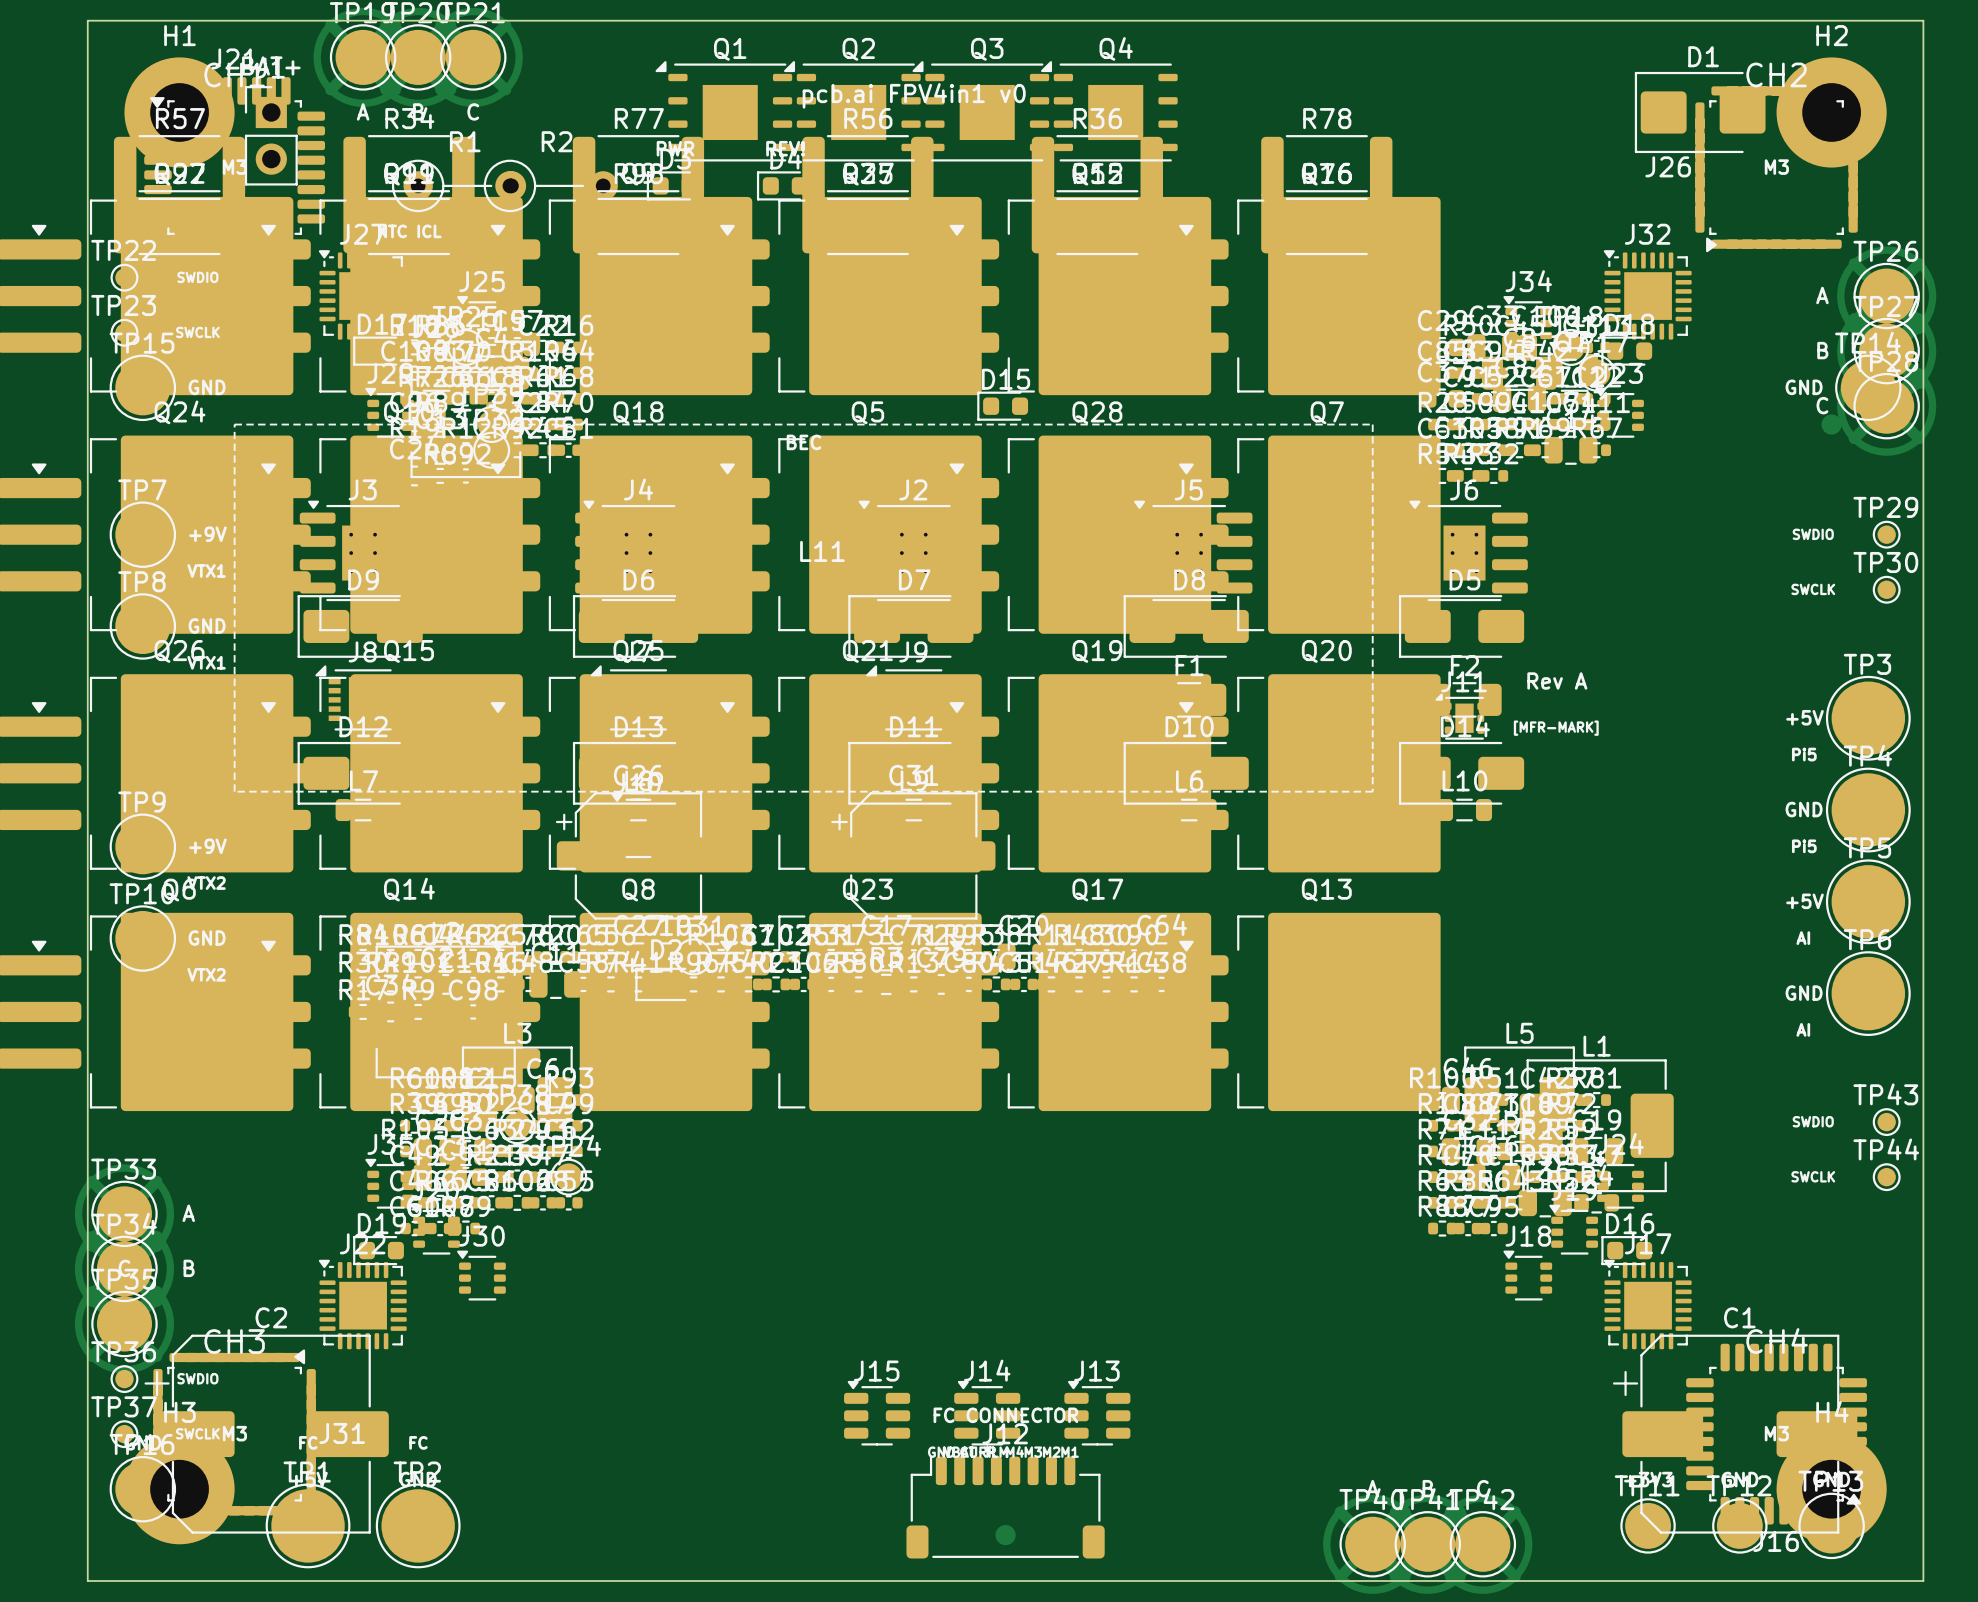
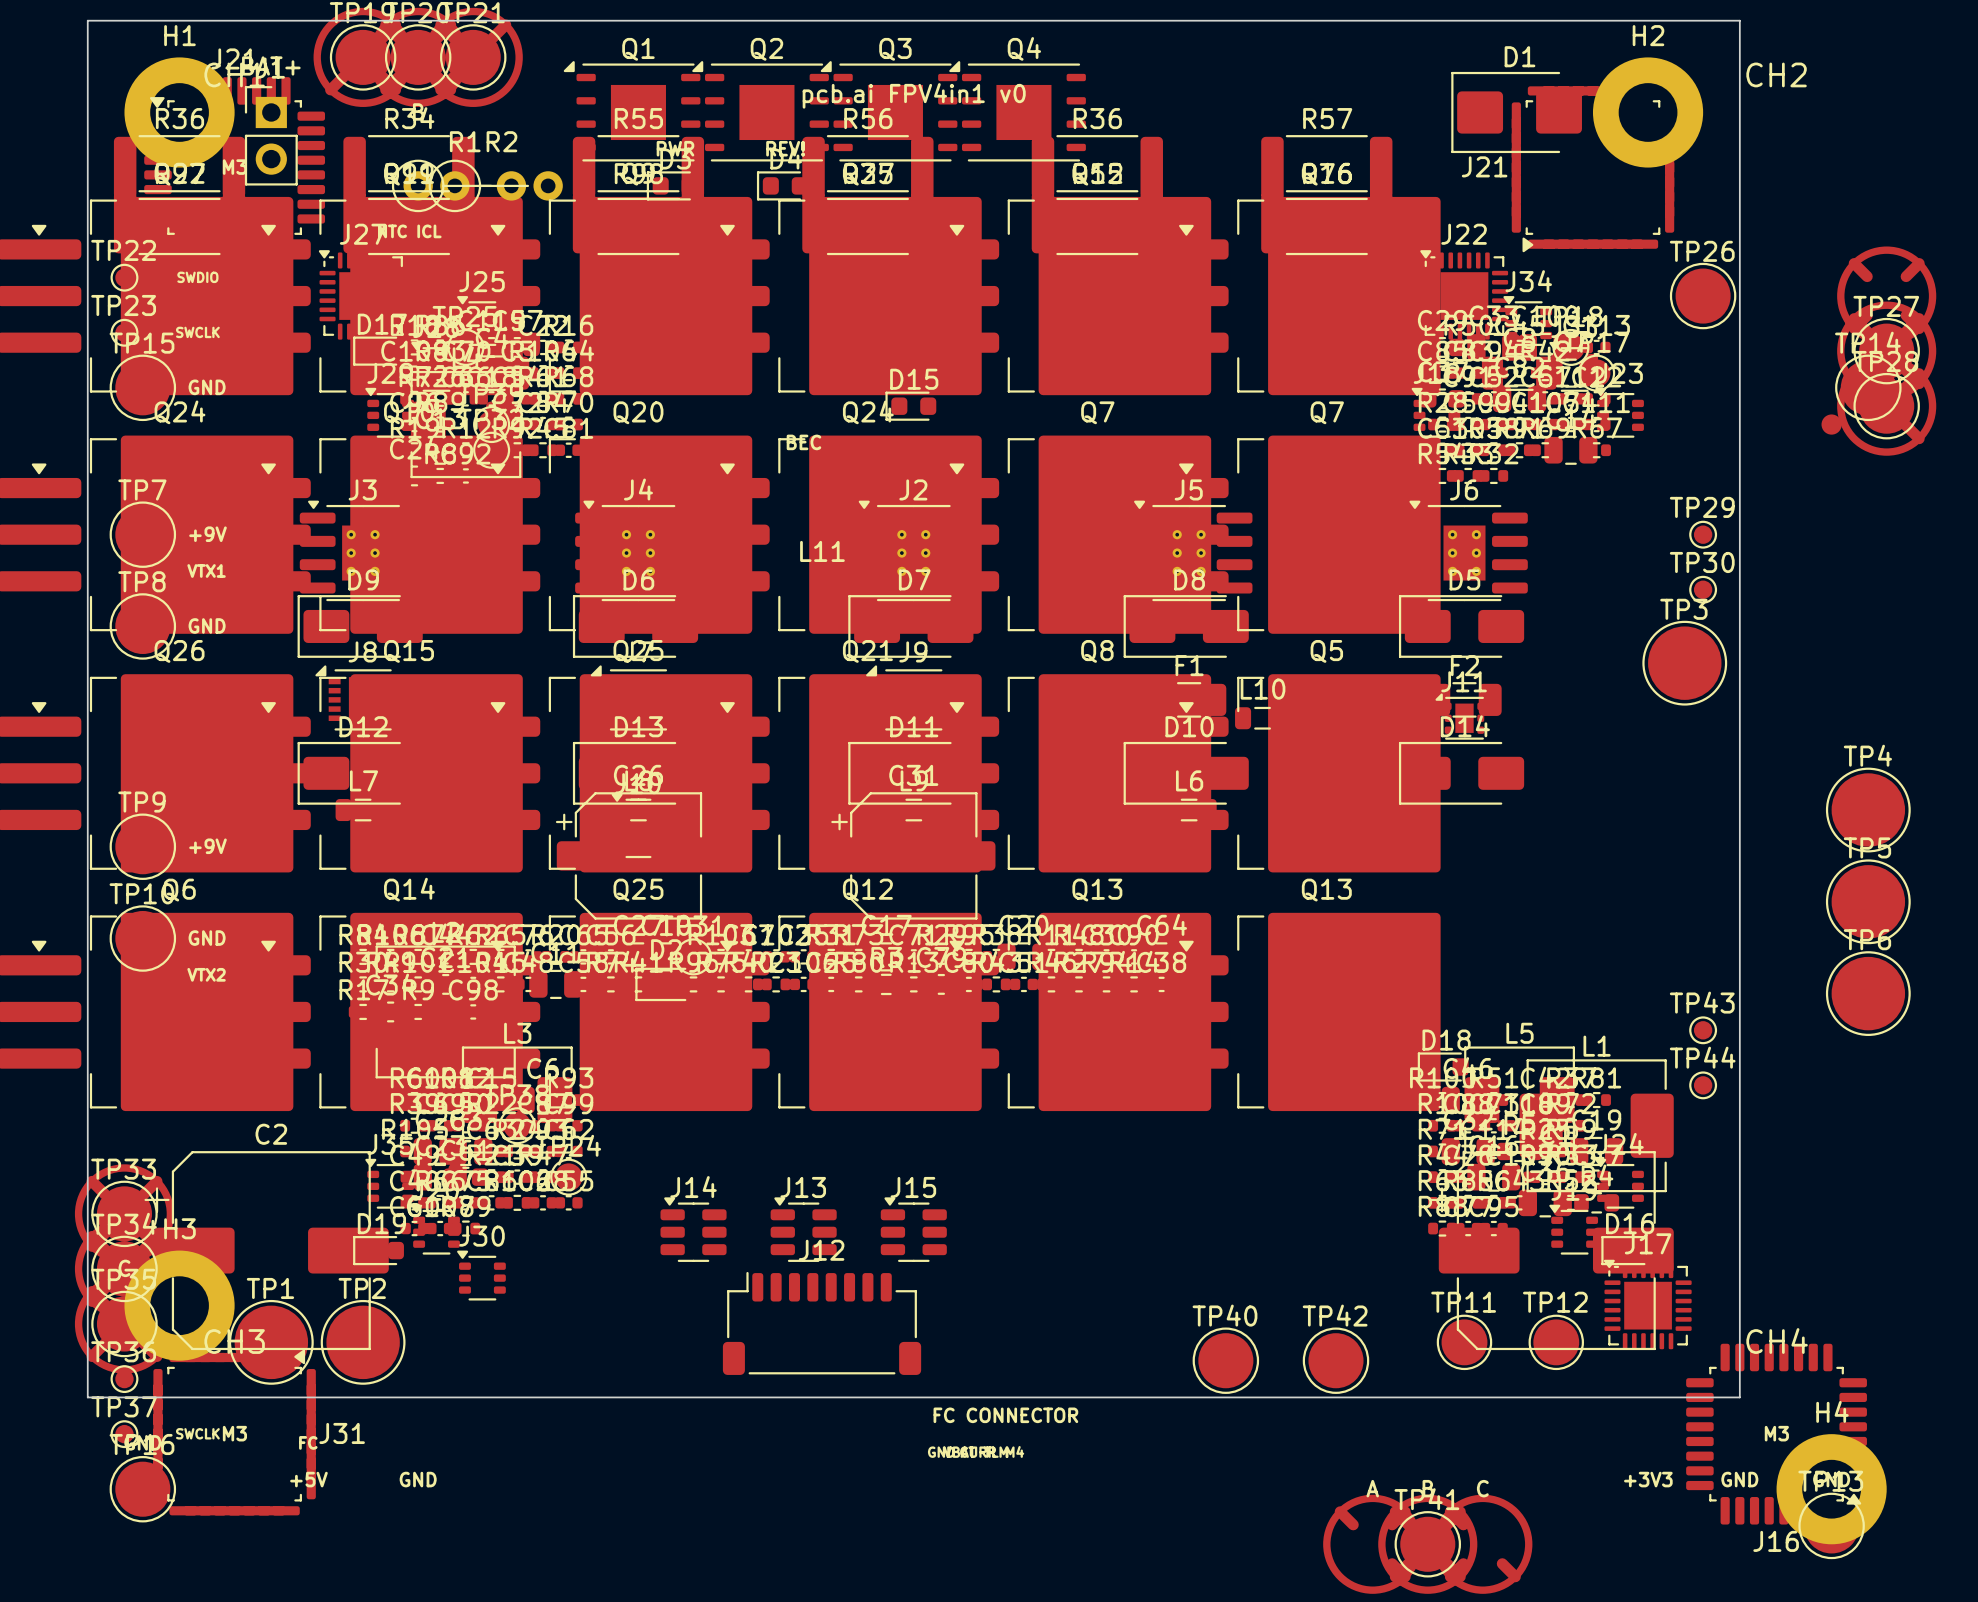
board edge: (1739, 20) (1923, 20) (1923, 1580) (87, 1580) (87, 1397) -> (1739, 20) (1739, 1397) (87, 1397)
track: (330, 24) (343, 37) -> none
track: (492, 76) (505, 89) -> none
text: A (363, 111) -> none
text: C (473, 111) -> none
Q1 position: (723, 111) -> (632, 111)
Q2 position: (852, 111) -> (760, 111)
Q3 position: (980, 111) -> (889, 111)
Q4 position: (1109, 111) -> (1017, 111)
D1 position: (1700, 112) -> (1516, 112)
H2 position: (1831, 112) -> (1648, 112)
R57 name: R57 (180, 118) -> R36 (179, 118)
R77 name: R77 (639, 118) -> R55 (638, 118)
R78 name: R78 (1327, 118) -> R57 (1327, 118)
text: M3 (1776, 167) -> none
J21: none -> (1592, 169)
J26: (1776, 169) -> none
R2 position: (550, 185) -> (495, 185)
J32: (1647, 294) -> none
text: A (1822, 295) -> none
TP26 position: (1886, 296) -> (1703, 296)
text: B (1822, 350) -> none
D18 position: (1626, 351) -> (1443, 1067)
text: GND (1804, 387) -> none
text: C (1822, 405) -> none
D15 position: (1002, 406) -> (910, 406)
Q18 name: Q18 (638, 412) -> Q20 (638, 412)
Q5 name: Q5 (867, 412) -> Q24 (868, 412)
Q28 name: Q28 (1097, 412) -> Q7 (1097, 412)
line: (234, 424) (1372, 424) (1372, 791) (234, 791) (234, 424) -> none
track: (1867, 425) (1854, 438) -> none
text: SWDIO (1813, 534) -> none
TP29 position: (1886, 534) -> (1703, 534)
text: SWCLK (1813, 589) -> none
TP30 position: (1886, 589) -> (1703, 589)
Q19 name: Q19 (1097, 651) -> Q8 (1097, 651)
Q20 name: Q20 (1326, 651) -> Q5 (1326, 651)
text: VTX1 (206, 662) -> none
text: Rev A (1557, 680) -> none
text: +5V (1805, 717) -> none
TP3 position: (1868, 718) -> (1684, 663)
text: [MFR-MARK] (1556, 728) -> none
text: Pi5 (1804, 754) -> none
text: GND (1804, 809) -> none
L10 position: (1464, 810) -> (1262, 718)
text: Pi5 (1804, 846) -> none
text: VTX2 (206, 883) -> none
Q8 name: Q8 (638, 890) -> Q25 (638, 890)
Q23 name: Q23 (867, 890) -> Q12 (867, 890)
Q17 name: Q17 (1097, 890) -> Q13 (1097, 890)
text: +5V (1805, 901) -> none
text: AI (1803, 938) -> none
text: GND (1804, 993) -> none
text: AI (1803, 1029) -> none
text: SWDIO (1813, 1121) -> none
TP43 position: (1886, 1122) -> (1703, 1030)
text: SWCLK (1813, 1176) -> none
TP44 position: (1886, 1177) -> (1703, 1085)
text: A (188, 1213) -> none
text: B (189, 1268) -> none
J18 position: (1527, 1275) -> (1435, 412)
J22 position: (362, 1304) -> (1464, 294)
text: SWDIO (197, 1378) -> none
J15 position: (877, 1413) -> (913, 1229)
J14 position: (987, 1413) -> (693, 1229)
J13 position: (1097, 1413) -> (803, 1229)
C2 position: (266, 1434) -> (266, 1250)
C1 position: (1735, 1434) -> (1551, 1250)
text: FC (418, 1442) -> none
text: M3 (1033, 1452) -> none
text: M2 (1051, 1452) -> none
text: M1 (1070, 1452) -> none
H3 position: (179, 1489) -> (179, 1305)
J12 position: (1005, 1507) -> (822, 1323)
track: (1515, 1511) (1502, 1524) -> none
TP1 position: (308, 1525) -> (271, 1342)
TP2 position: (418, 1525) -> (363, 1342)
drawing: [995, 1525, 1016, 1546] -> none
TP11 position: (1648, 1525) -> (1464, 1342)
TP12 position: (1739, 1525) -> (1556, 1342)
TP40 position: (1372, 1544) -> (1225, 1360)
TP42 position: (1482, 1544) -> (1336, 1360)
track: (1353, 1563) (1340, 1576) -> none

